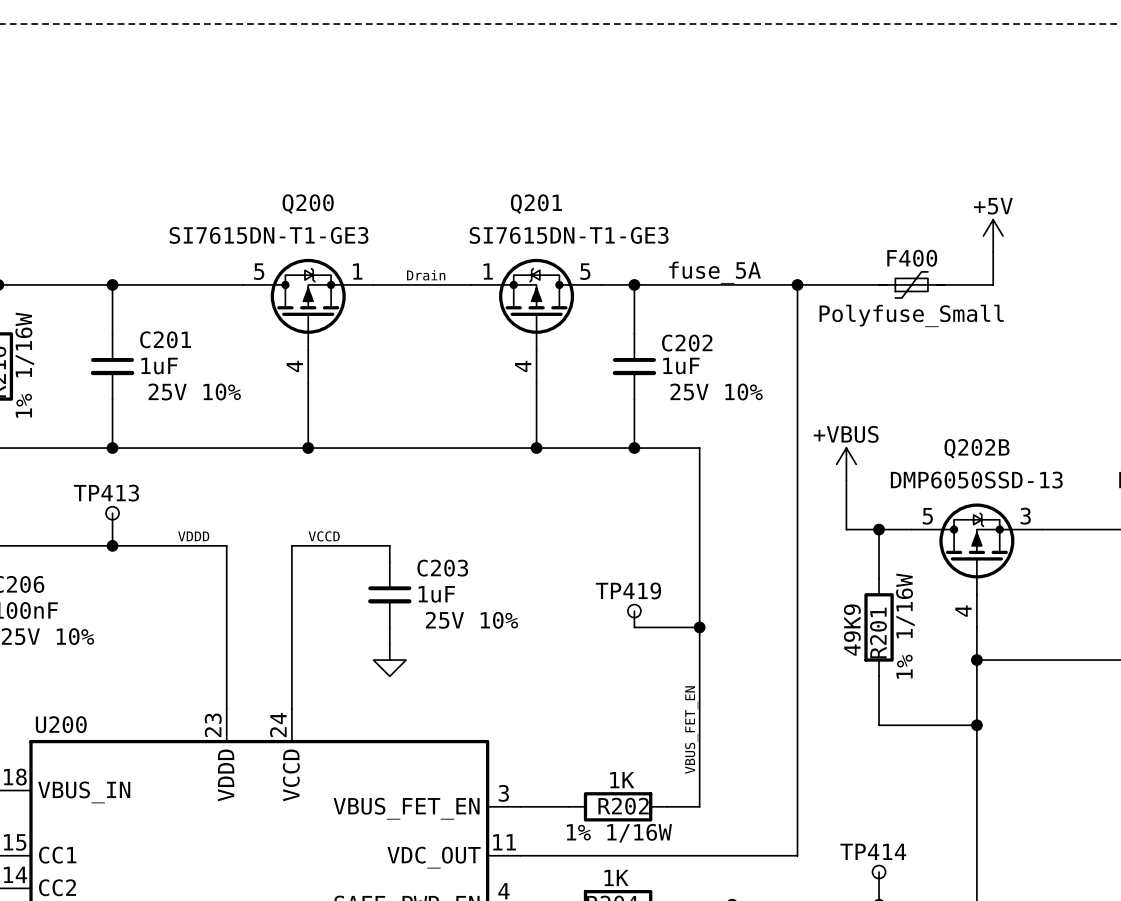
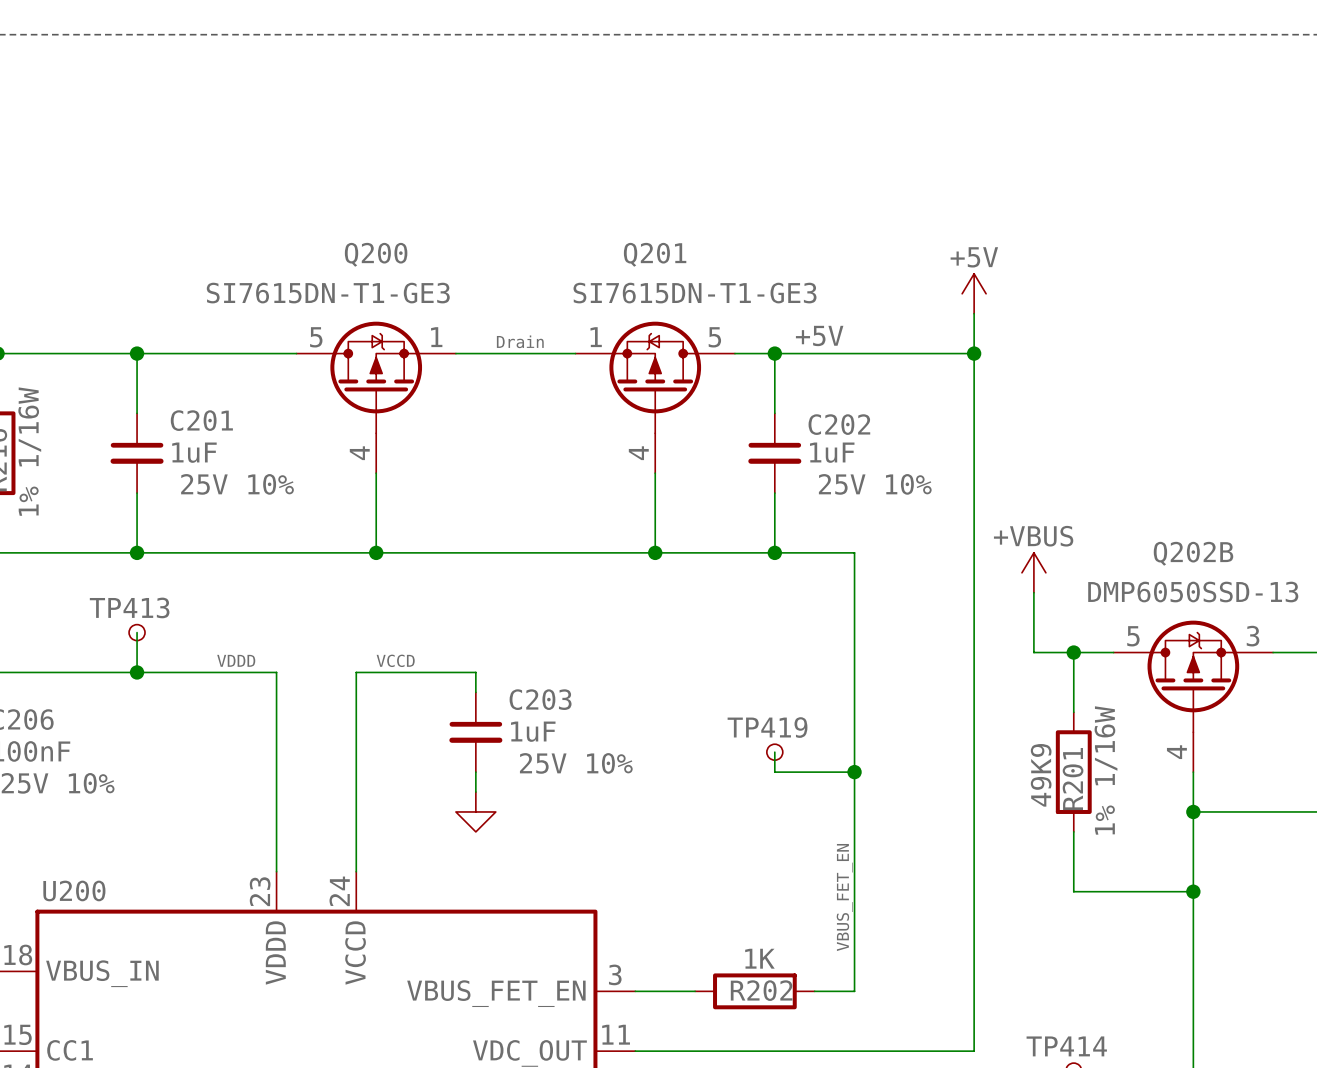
power symbol position: +5V (993, 236) -> +5V (974, 293)
wire: (993, 252) (993, 284) (944, 284) -> none
label: none -> +5V (819, 335)
label: fuse_5A (715, 272) -> none
wire: (797, 284) (879, 284) -> (974, 353) (974, 313)
F400: Polyfuse_Small (911, 284) -> none
R202 text: 1% 1/16W (619, 833) -> none

